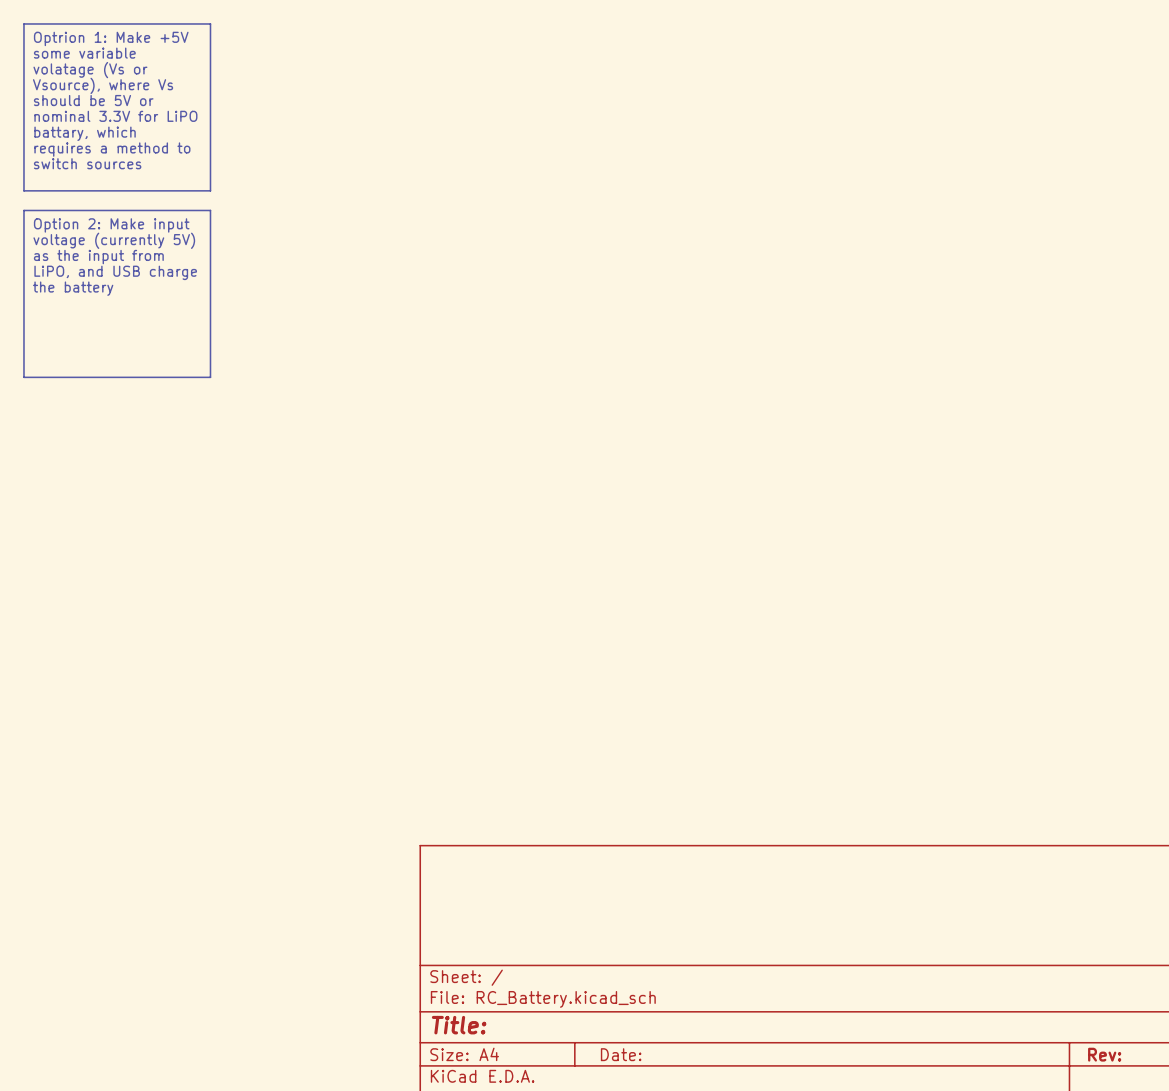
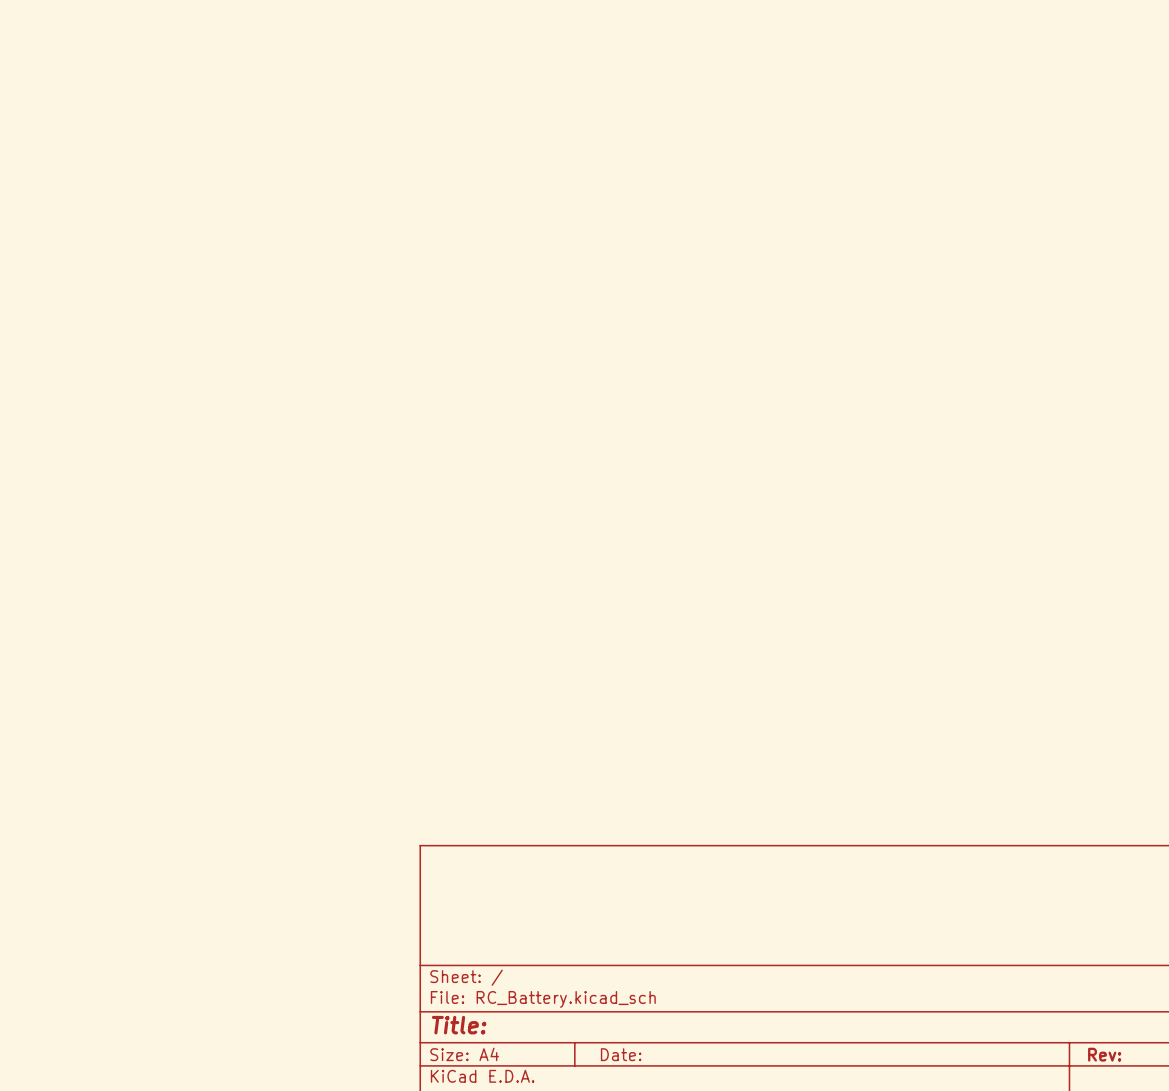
line: (23, 23) (23, 190) (210, 190) (210, 23) (23, 23) -> none
text: Optrion 1: Make +5V (111, 38) -> none
text: some variable (84, 53) -> none
text: volatage (Vs or (90, 70) -> none
text: Vsource), where Vs (103, 85) -> none
text: should be 5V or (93, 100) -> none
text: nominal 3.3V for LiPO (115, 116) -> none
text: battary, which (85, 133) -> none
text: requires a method to (112, 149) -> none
text: switch sources (87, 163) -> none
line: (23, 210) (210, 210) (210, 377) (23, 377) (23, 210) -> none
text: Option 2: Make input (111, 225) -> none
text: voltage (currently 5V) (114, 240) -> none
text: as the input from (98, 257) -> none
text: LiPO, and USB charge (115, 272) -> none
text: the battery (73, 288) -> none

